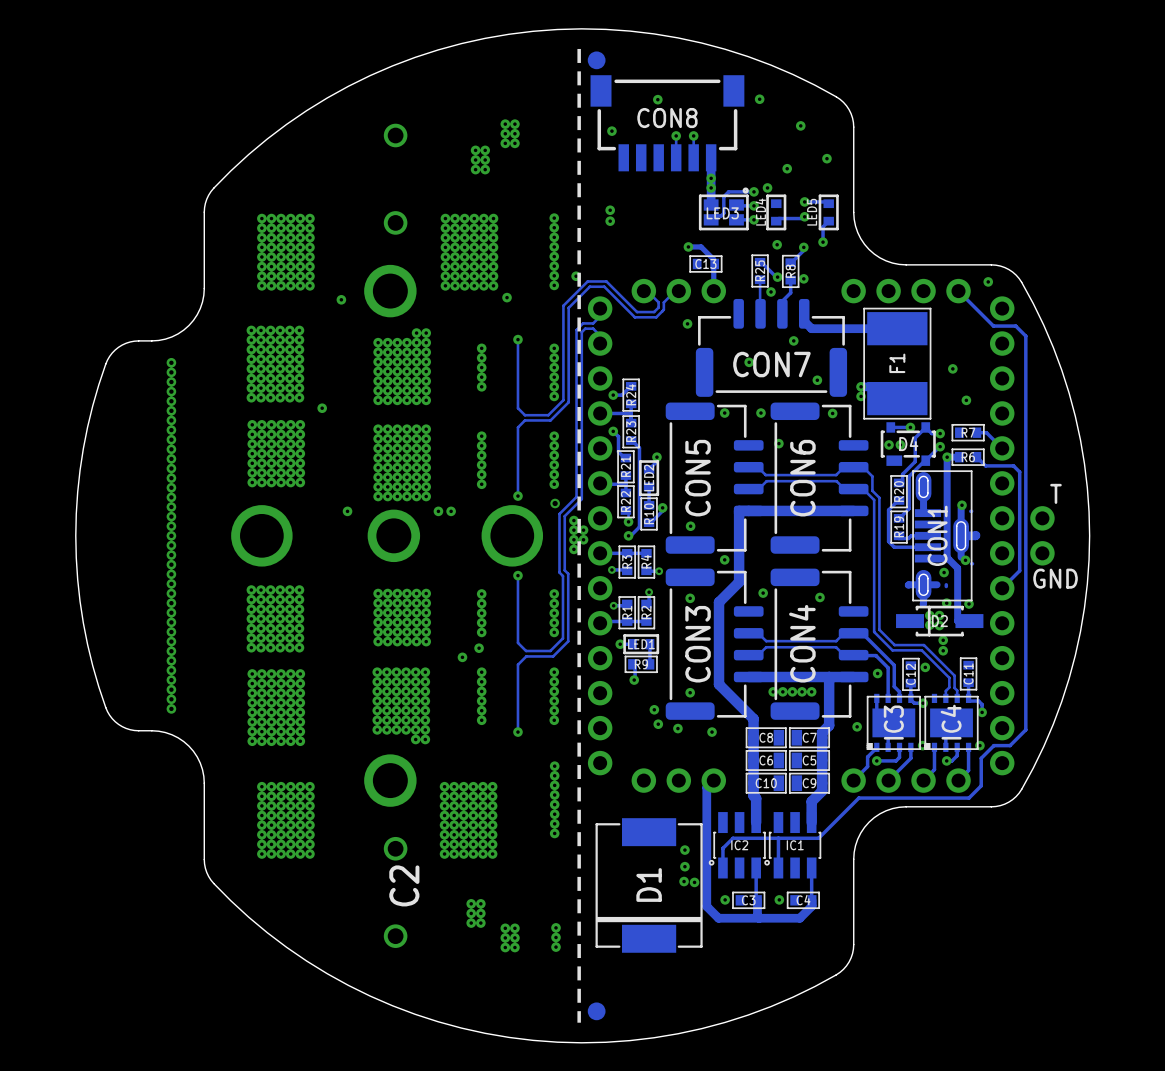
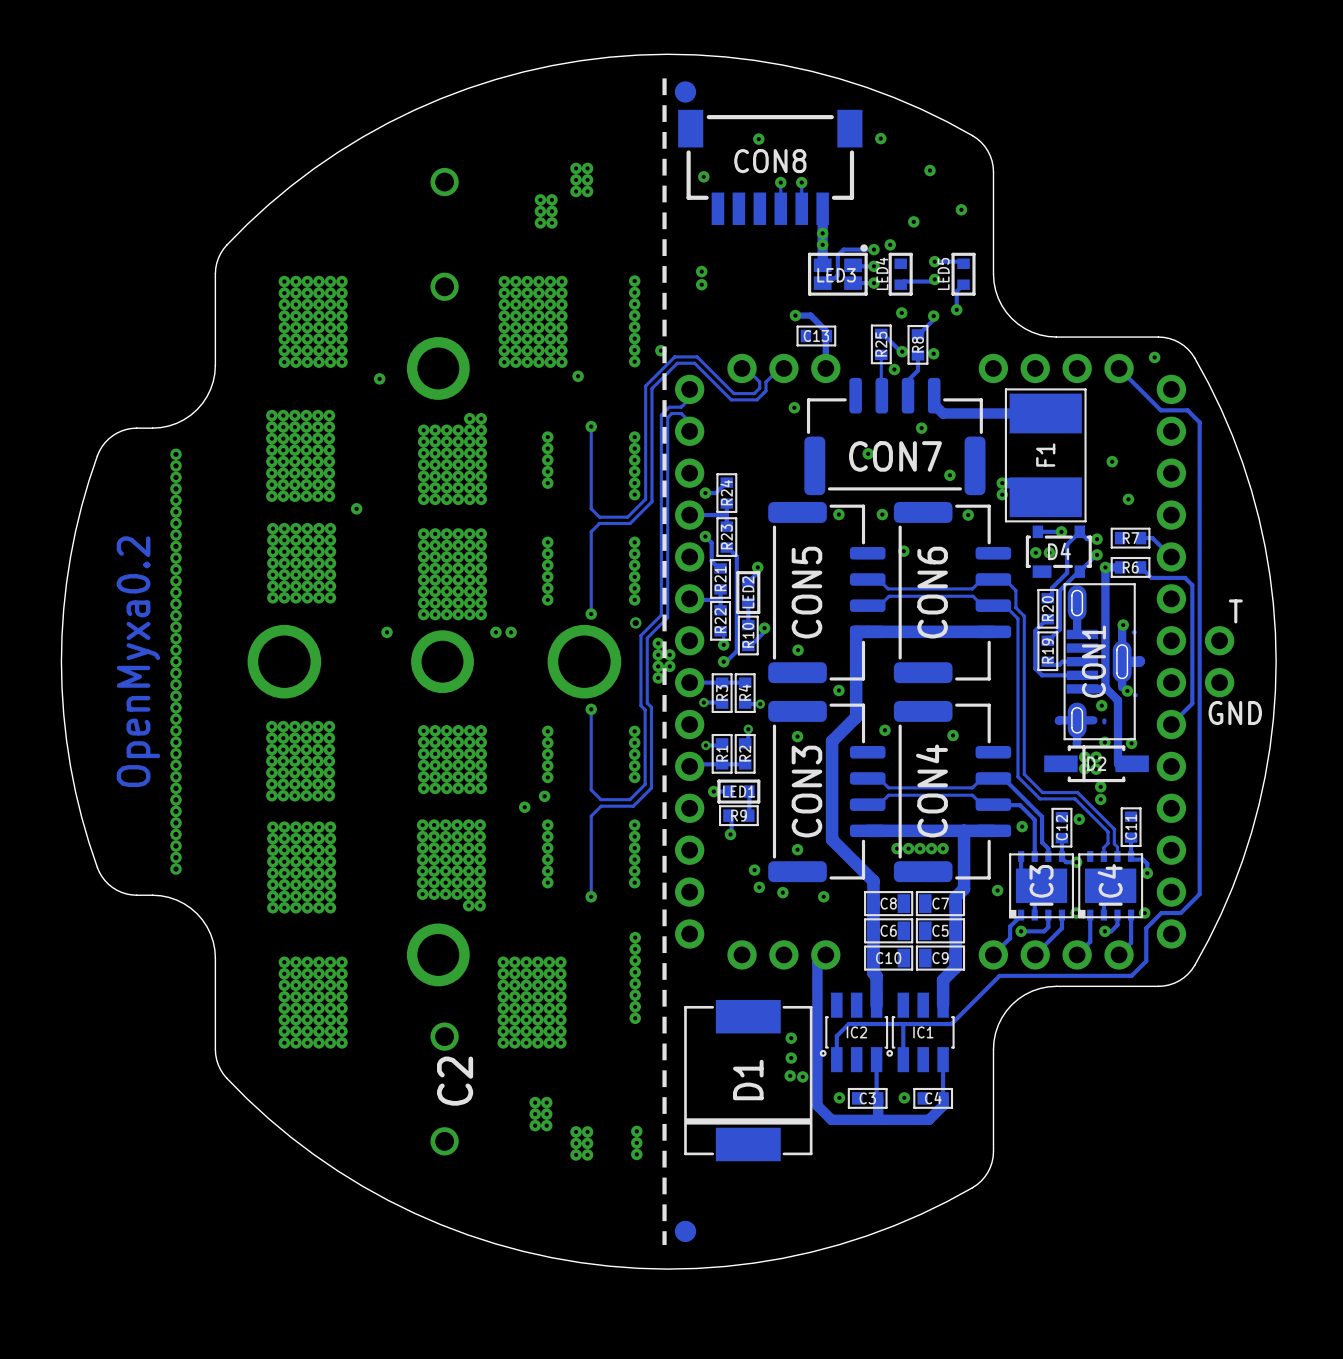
text: none -> OpenMyxa0.2 (138, 661)

